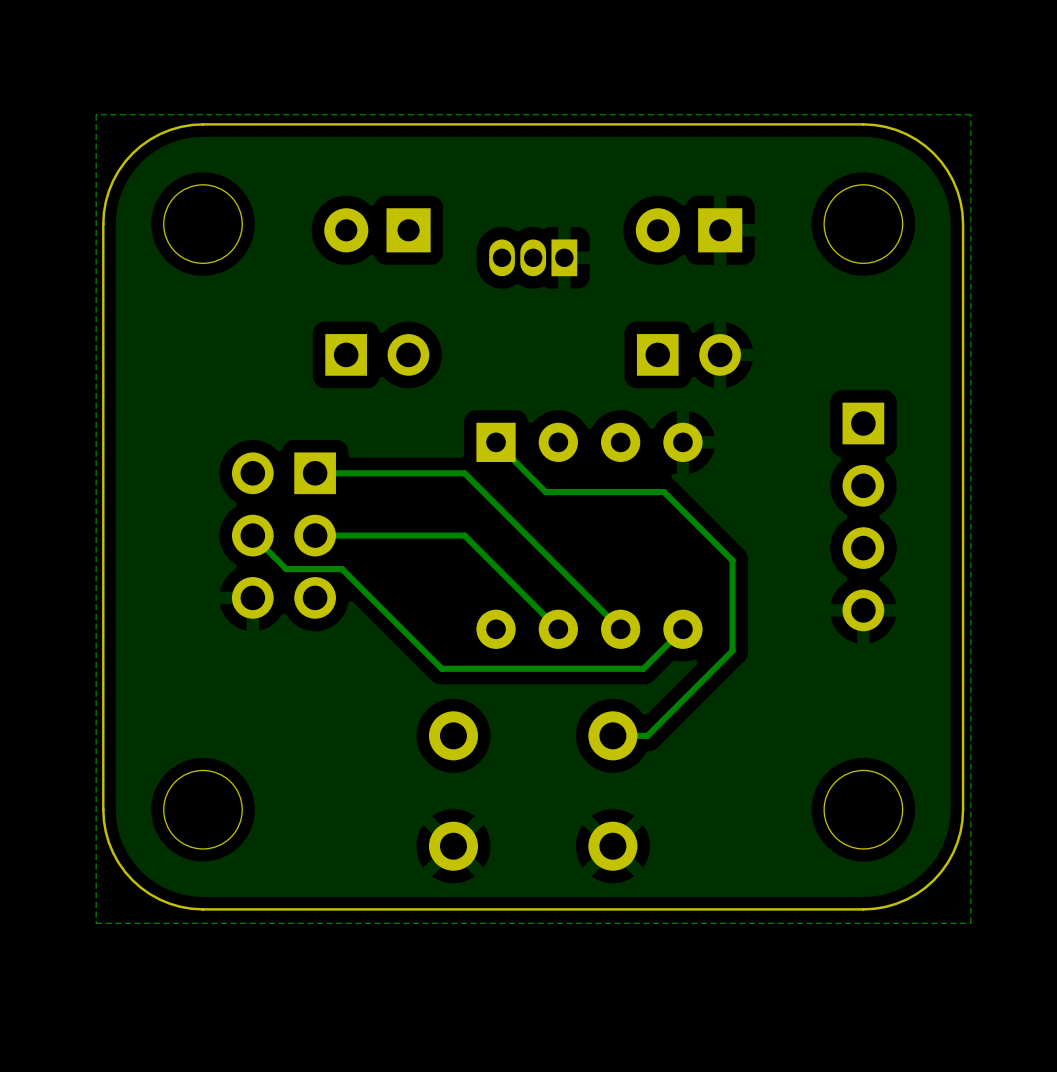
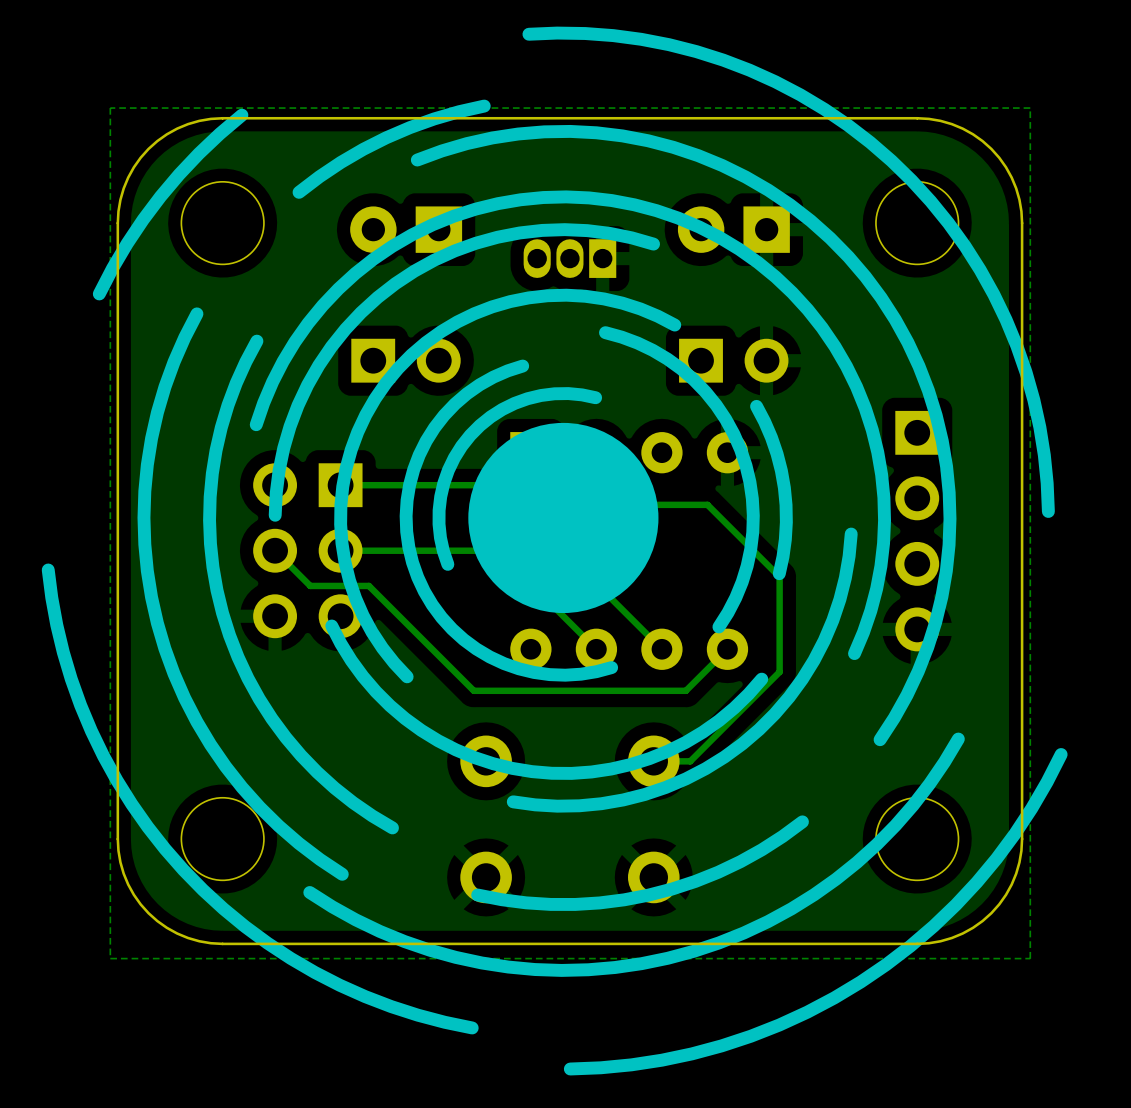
line: none -> (528, 34) (557, 33) (613, 35) (669, 44) (723, 60) (749, 70) (800, 94) (847, 125) (891, 160) (930, 201) (948, 223) (980, 269) (1006, 319) (1026, 372) (1033, 399) (1044, 455) (1048, 511)
line: none -> (484, 106) (434, 118) (386, 137) (340, 162) (299, 192)
line: none -> (241, 115) (198, 153) (160, 196) (127, 243) (99, 293)
line: none -> (417, 160) (466, 143) (492, 137) (544, 131) (596, 132) (648, 140) (698, 155) (722, 165) (768, 190) (790, 204) (830, 238) (865, 276) (881, 297) (907, 342) (928, 390) (936, 415) (946, 466) (950, 518) (946, 570) (935, 622) (918, 671) (907, 694) (880, 739)
line: none -> (653, 244) (609, 233) (587, 230) (564, 229) (519, 232) (497, 237) (454, 250) (434, 260) (395, 283) (377, 297) (345, 329) (318, 365) (307, 385) (298, 405) (283, 448) (276, 492) (275, 515)
line: none -> (196, 313) (184, 337) (164, 386) (151, 438) (147, 464) (144, 491) (144, 544) (151, 597) (157, 623) (164, 648) (184, 698) (210, 744) (225, 766) (242, 787) (278, 826) (298, 843) (342, 874)
line: none -> (674, 325) (640, 308) (604, 298) (566, 295) (528, 297) (492, 306) (474, 313) (441, 331) (411, 355) (386, 383) (365, 414) (351, 449) (342, 486) (340, 524) (341, 543) (349, 580) (363, 615) (382, 648) (407, 676)
line: none -> (605, 332) (637, 343) (652, 350) (681, 368) (705, 392) (716, 405) (725, 419) (740, 449) (749, 482) (752, 498) (753, 515) (750, 549) (747, 565) (735, 597) (718, 626)
line: none -> (256, 341) (245, 361) (228, 405) (216, 450) (212, 473) (209, 520) (210, 543) (212, 567) (222, 612) (229, 635) (247, 678) (271, 718) (285, 737) (300, 755) (334, 788) (353, 802) (392, 827)
line: none -> (522, 366) (493, 377) (466, 393) (444, 415) (426, 441) (413, 469) (407, 500) (406, 531) (412, 562) (424, 591) (441, 617) (463, 639) (489, 656) (518, 668) (549, 674) (581, 674) (611, 667)
line: none -> (595, 397) (582, 394) (554, 393) (527, 398) (502, 409) (479, 425) (470, 435) (461, 446) (448, 470) (440, 496) (439, 524) (440, 537) (447, 564)
line: none -> (756, 406) (771, 437) (784, 487) (785, 539) (779, 573)
drawing: none -> [468, 422, 659, 614]
line: none -> (256, 424) (272, 381) (294, 341) (308, 323) (322, 305) (355, 273) (373, 259) (412, 234) (453, 216) (475, 209) (497, 203) (543, 197) (589, 197) (611, 200) (656, 210) (678, 218) (719, 237) (739, 249) (775, 277) (792, 292) (822, 327) (834, 346) (846, 366) (865, 408) (877, 452) (883, 497) (884, 520) (880, 566) (876, 588) (870, 610) (854, 653)
line: none -> (851, 534) (849, 556) (839, 599) (832, 620) (814, 660) (802, 679) (774, 713) (742, 743) (705, 768) (665, 787) (644, 794) (623, 799) (579, 805) (557, 806) (513, 801)
line: none -> (48, 569) (56, 625) (63, 652) (71, 679) (91, 731) (117, 780) (131, 804) (147, 827) (183, 870) (202, 889) (245, 926) (290, 958) (314, 972) (365, 996) (391, 1006) (417, 1015) (472, 1027)
line: none -> (331, 626) (351, 660) (363, 676) (390, 705) (421, 730) (438, 740) (474, 757) (493, 763) (532, 771) (571, 773) (591, 771) (611, 769) (649, 758) (685, 742) (702, 732) (734, 707) (761, 679)
line: none -> (958, 739) (944, 761) (913, 805) (876, 844) (836, 879) (791, 908) (743, 932) (693, 951) (667, 958) (615, 967) (561, 970) (534, 969) (481, 962) (429, 950) (379, 931) (355, 919) (309, 892)
line: none -> (1061, 754) (1031, 808) (1014, 834) (976, 882) (955, 904) (910, 946) (860, 982) (834, 997) (779, 1025) (721, 1045) (692, 1053) (631, 1064) (570, 1069)
line: none -> (802, 821) (782, 836) (740, 861) (695, 881) (648, 895) (599, 902) (550, 904) (526, 902) (477, 895)

